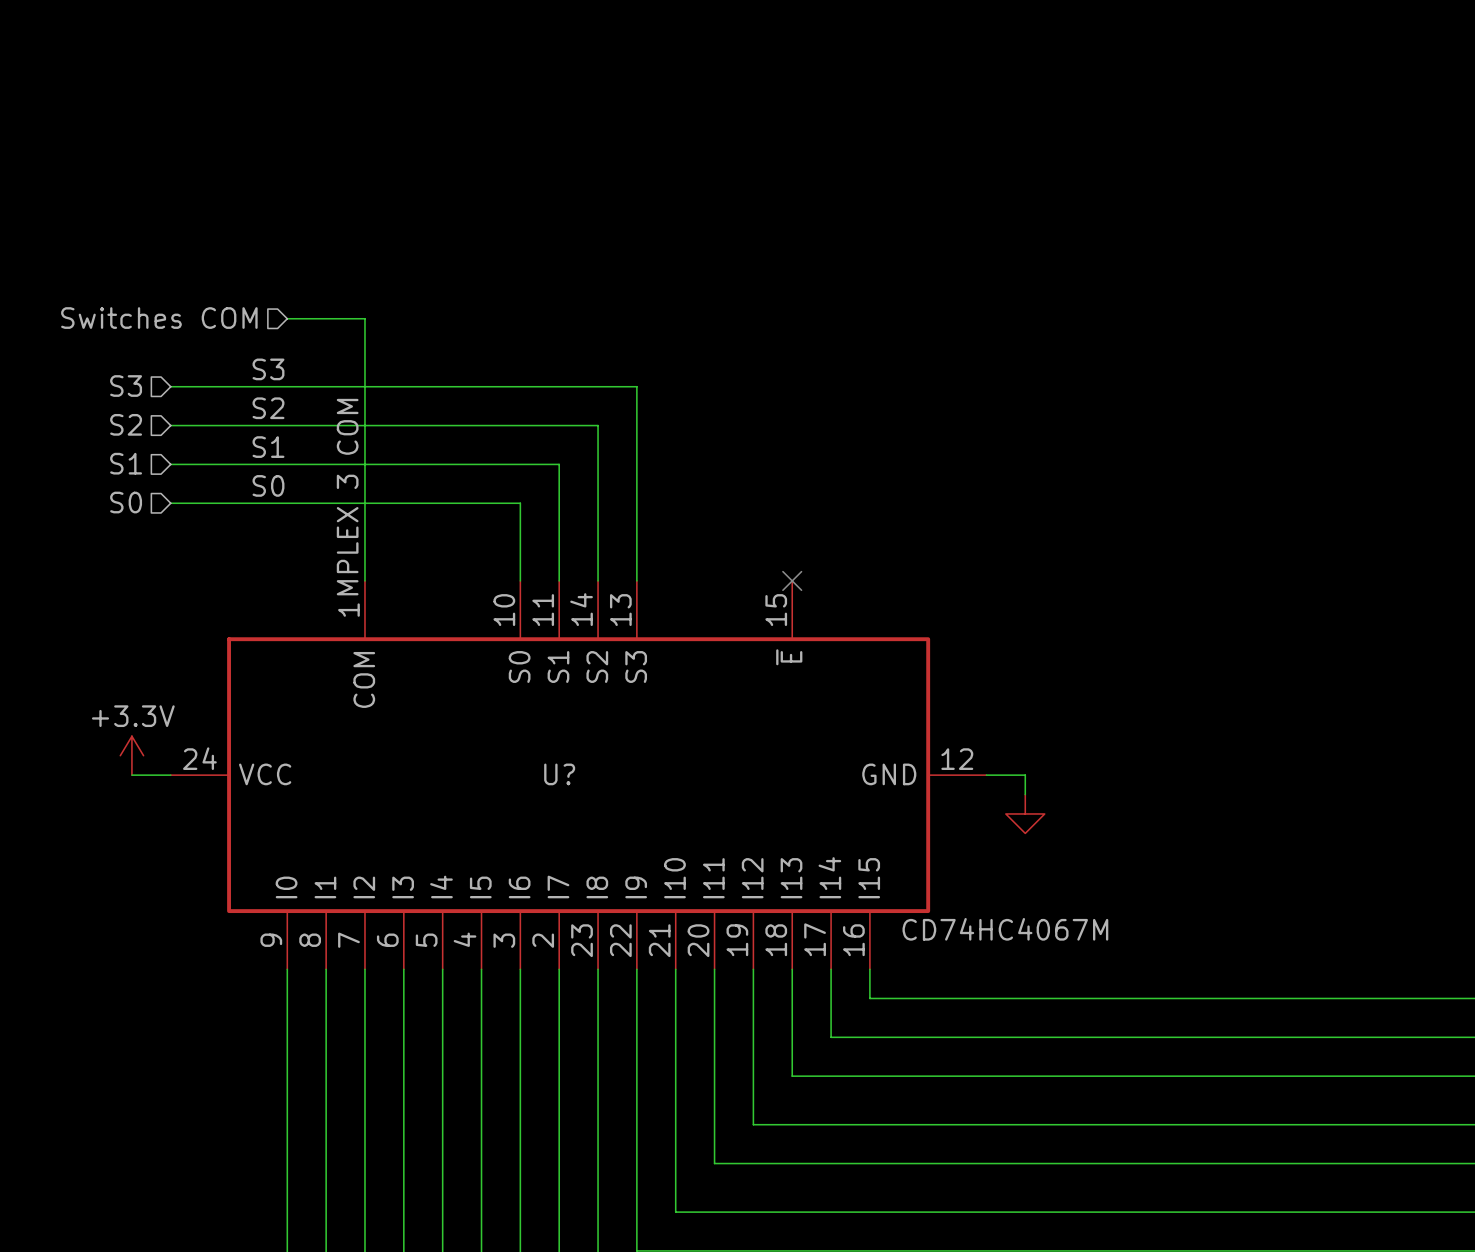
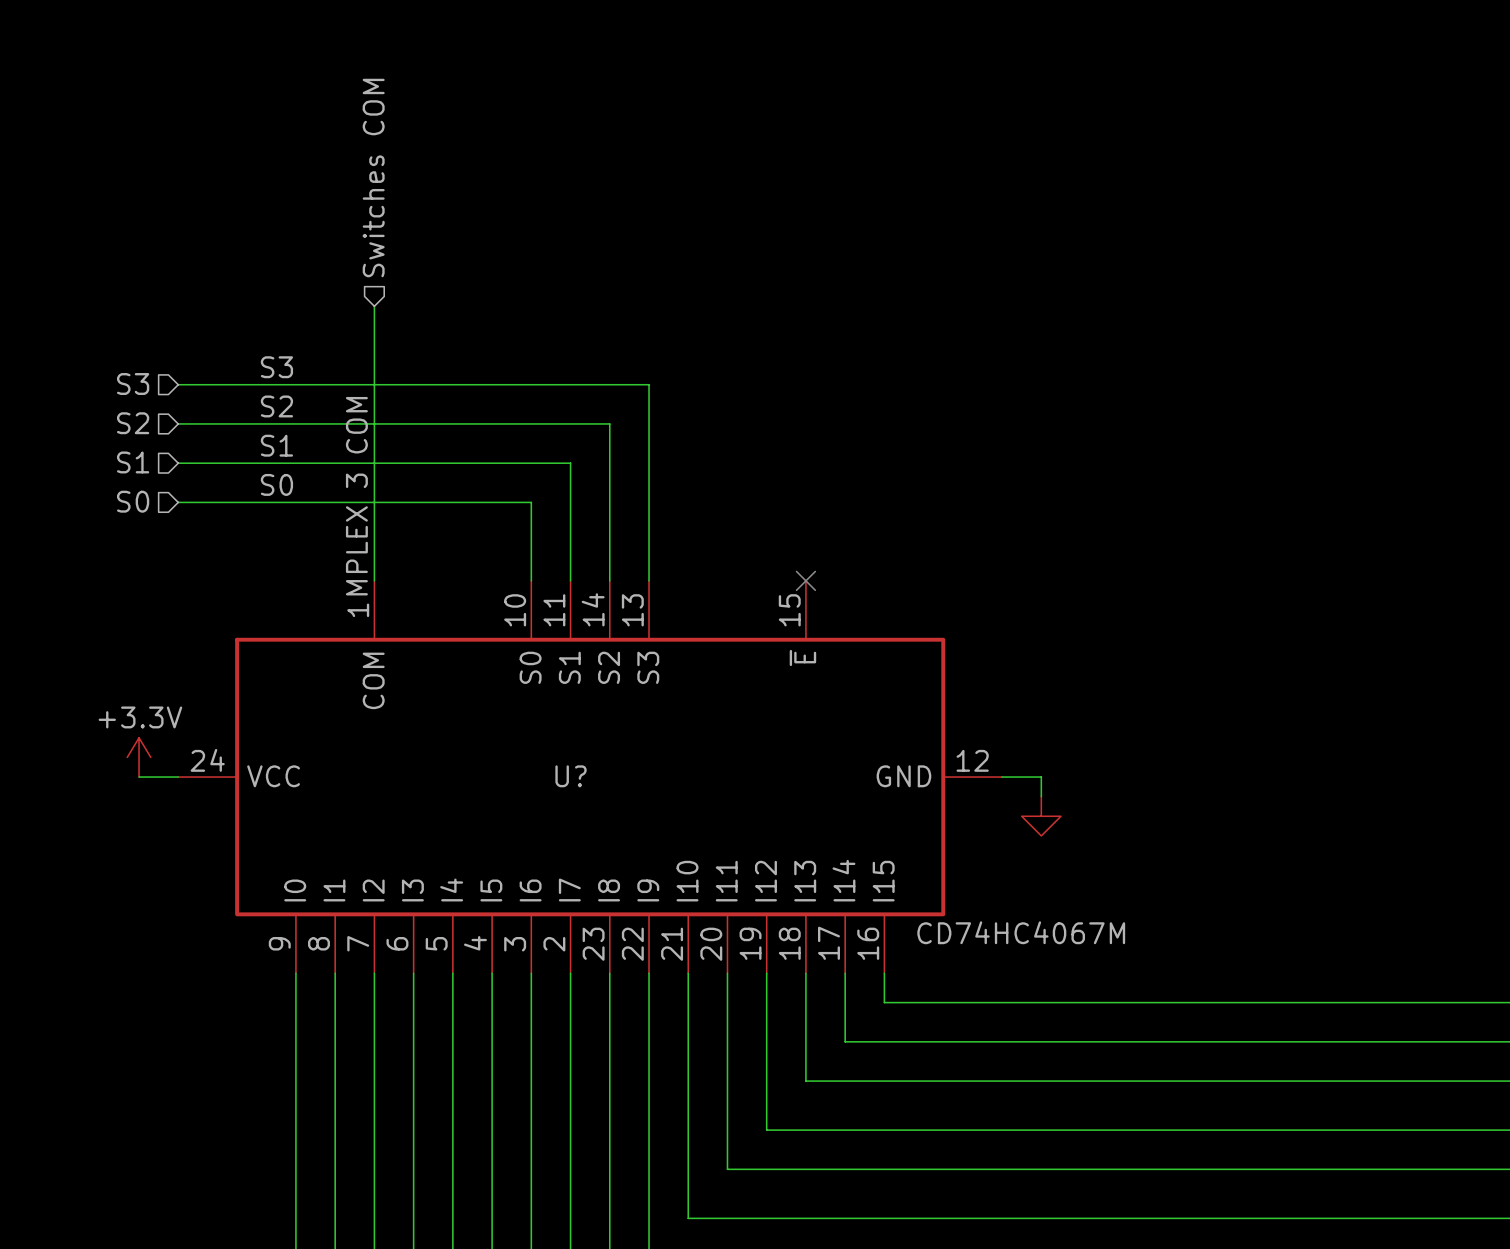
hierarchical label rotation: 0° (159, 318) -> 90° clockwise (373, 178)
hierarchical label position: Switches COM (159, 318) -> Switches COM (373, 178)
wire: (287, 318) (364, 318) -> (374, 306) (374, 316)

